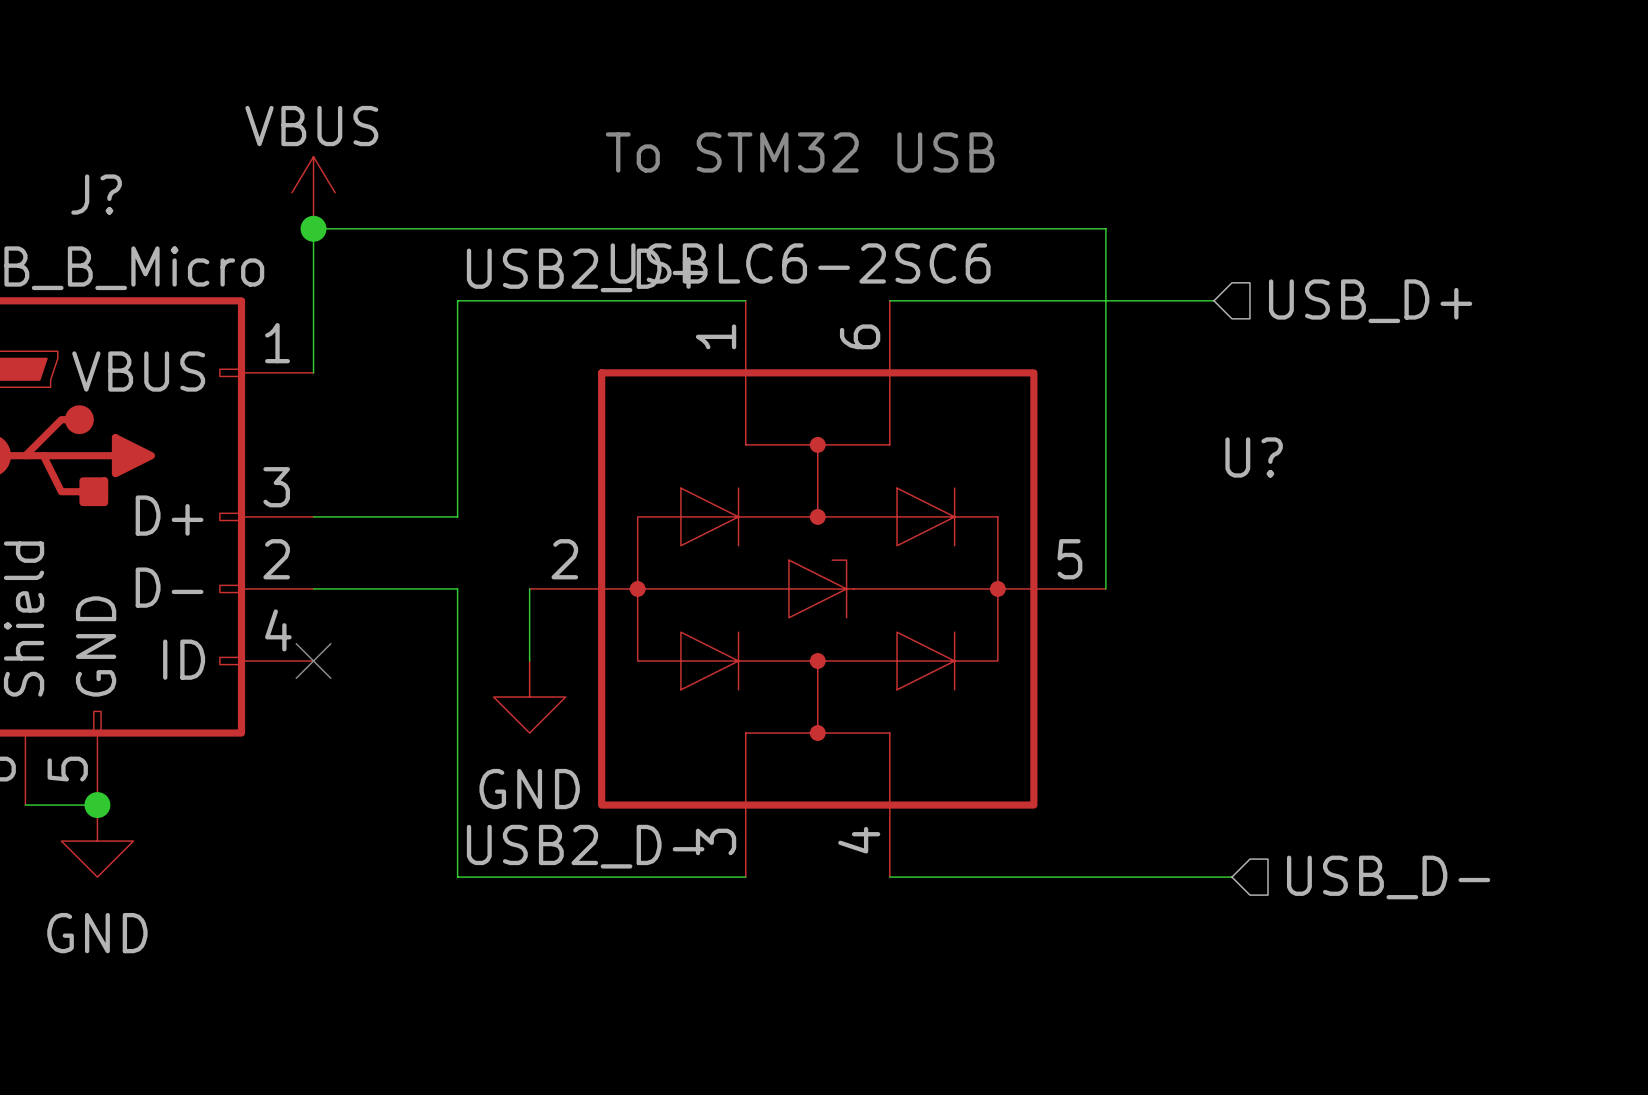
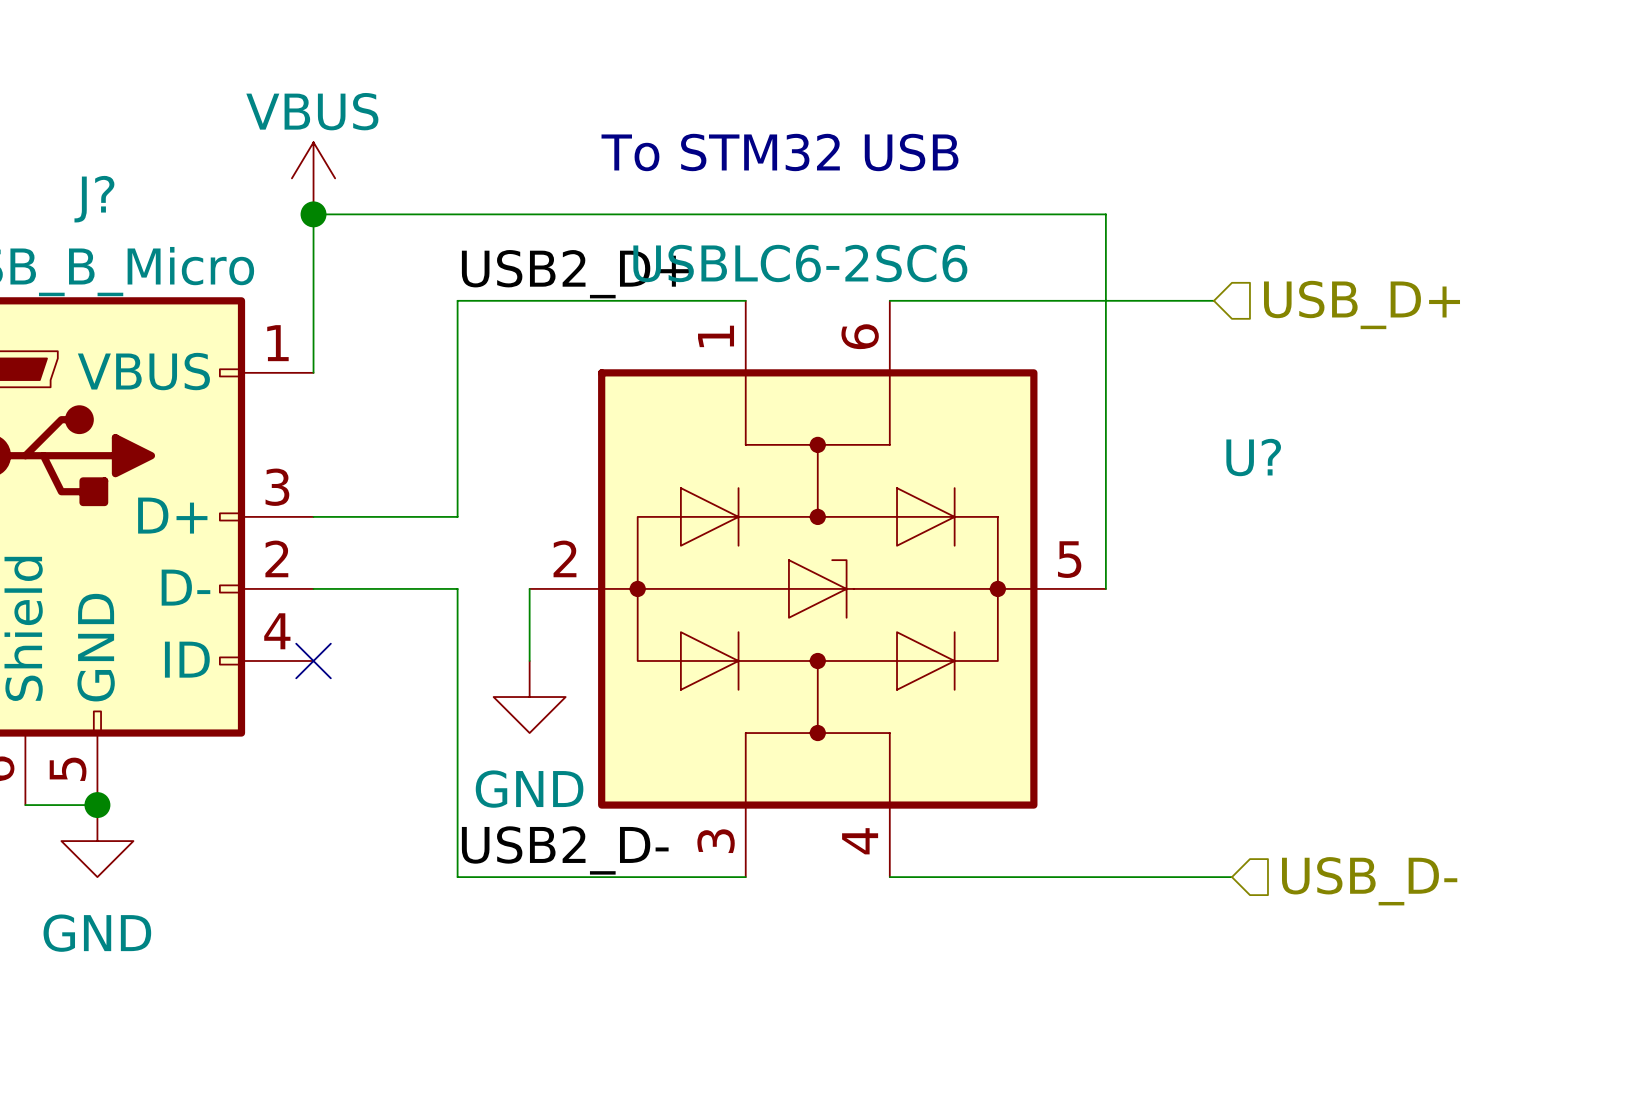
power symbol position: VBUS (313, 192) -> VBUS (313, 178)
wire: (313, 228) (1105, 228) -> (313, 228) (313, 214) (1105, 214) (1105, 228)
junction position: (313, 228) -> (313, 214)

